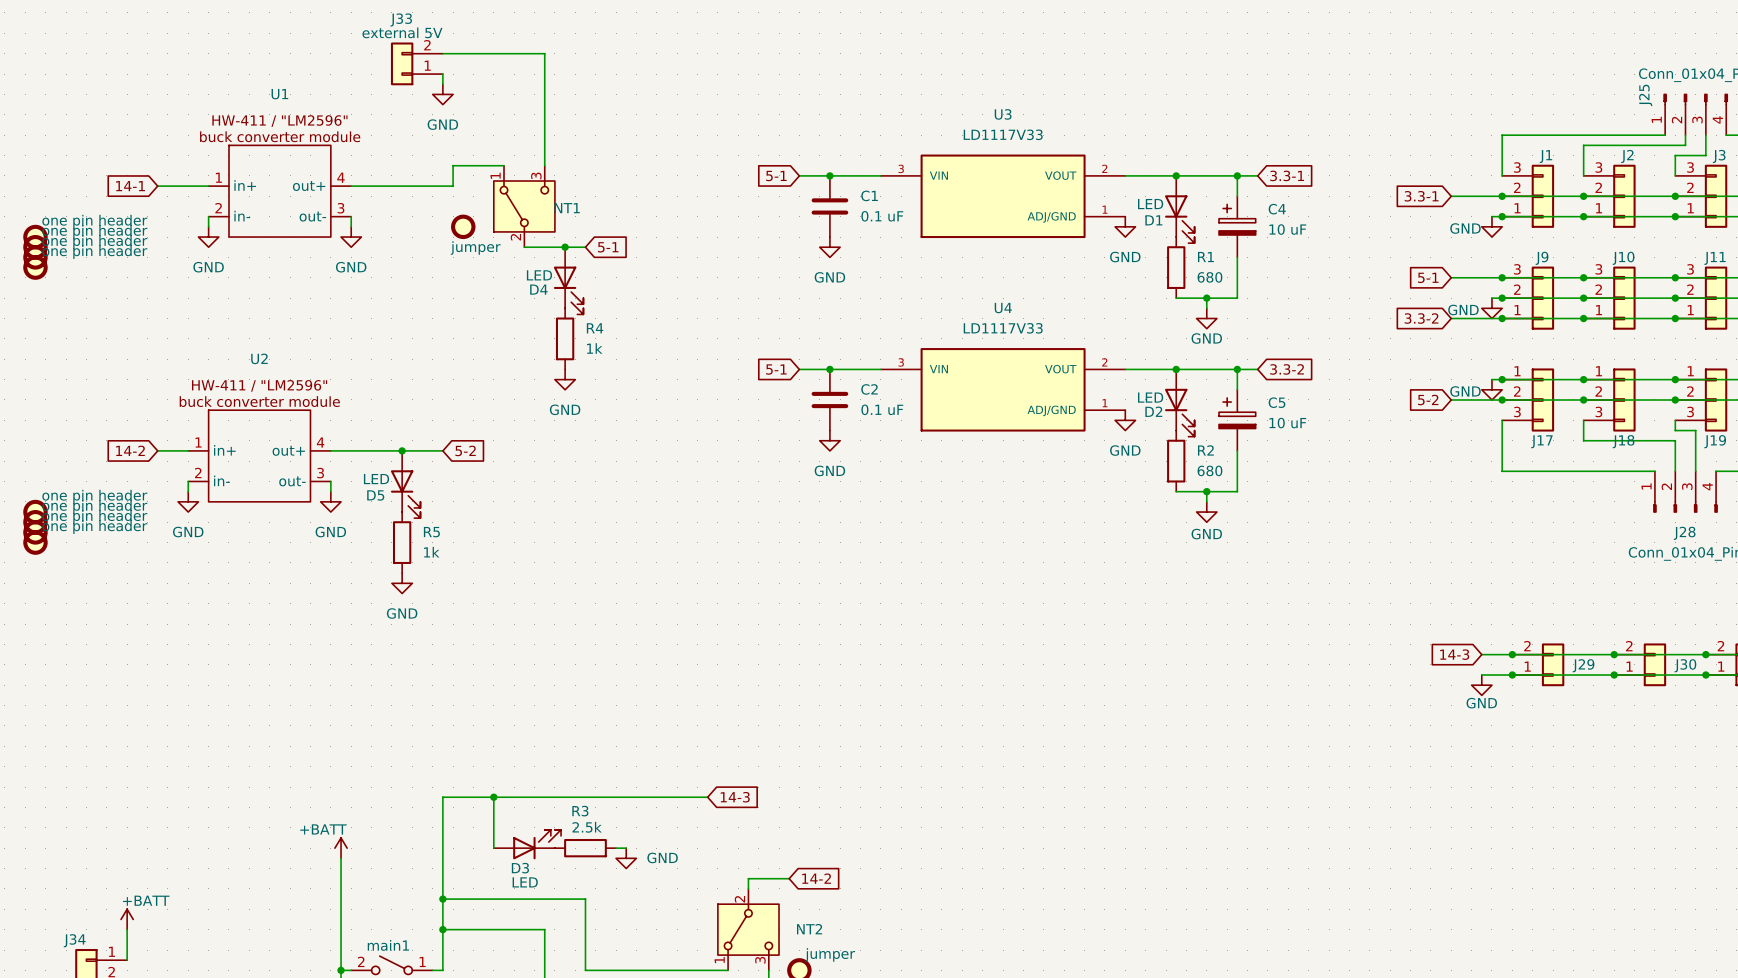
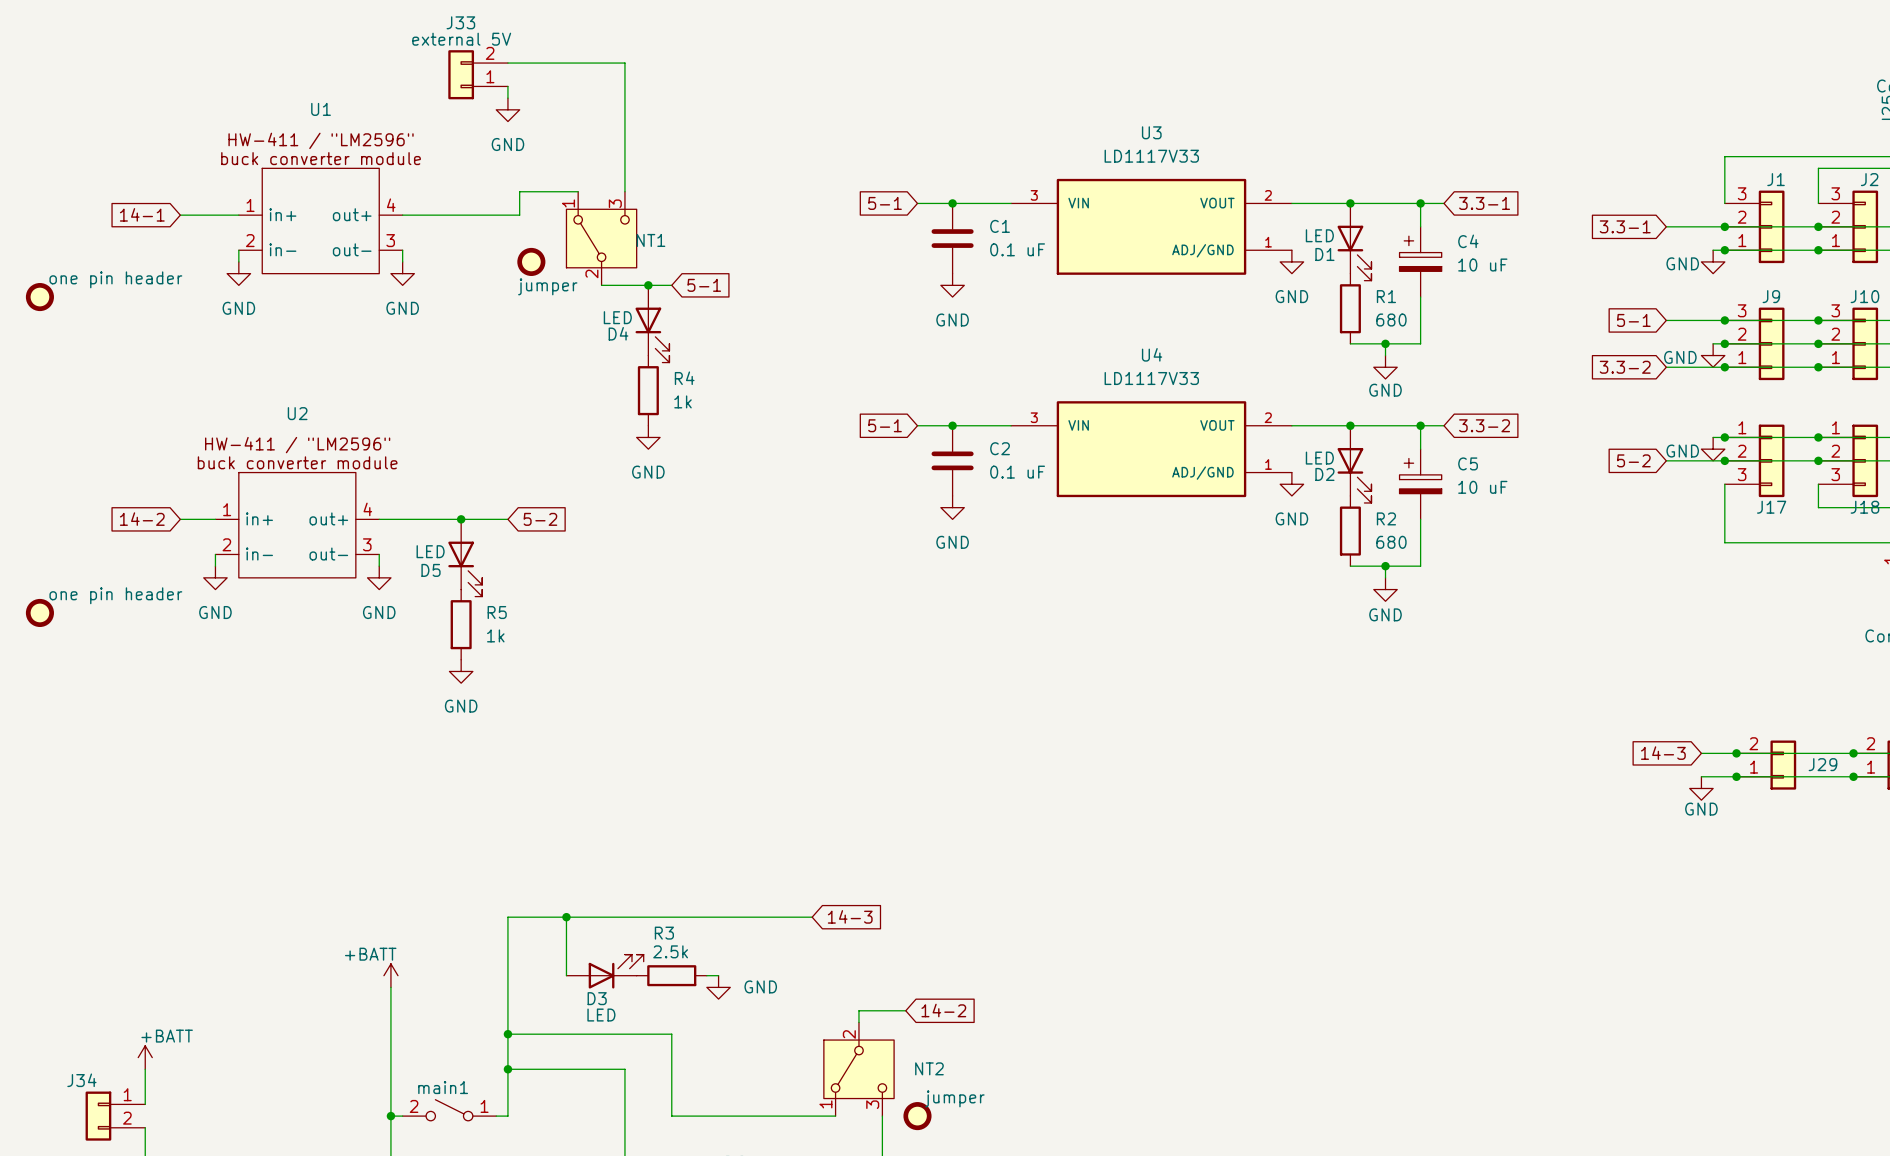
part: one pin header (35, 237) -> none
part: one pin header (35, 247) -> none
part: one pin header (35, 267) -> none
part: one pin header (35, 512) -> none
part: one pin header (35, 522) -> none
part: one pin header (35, 542) -> none

